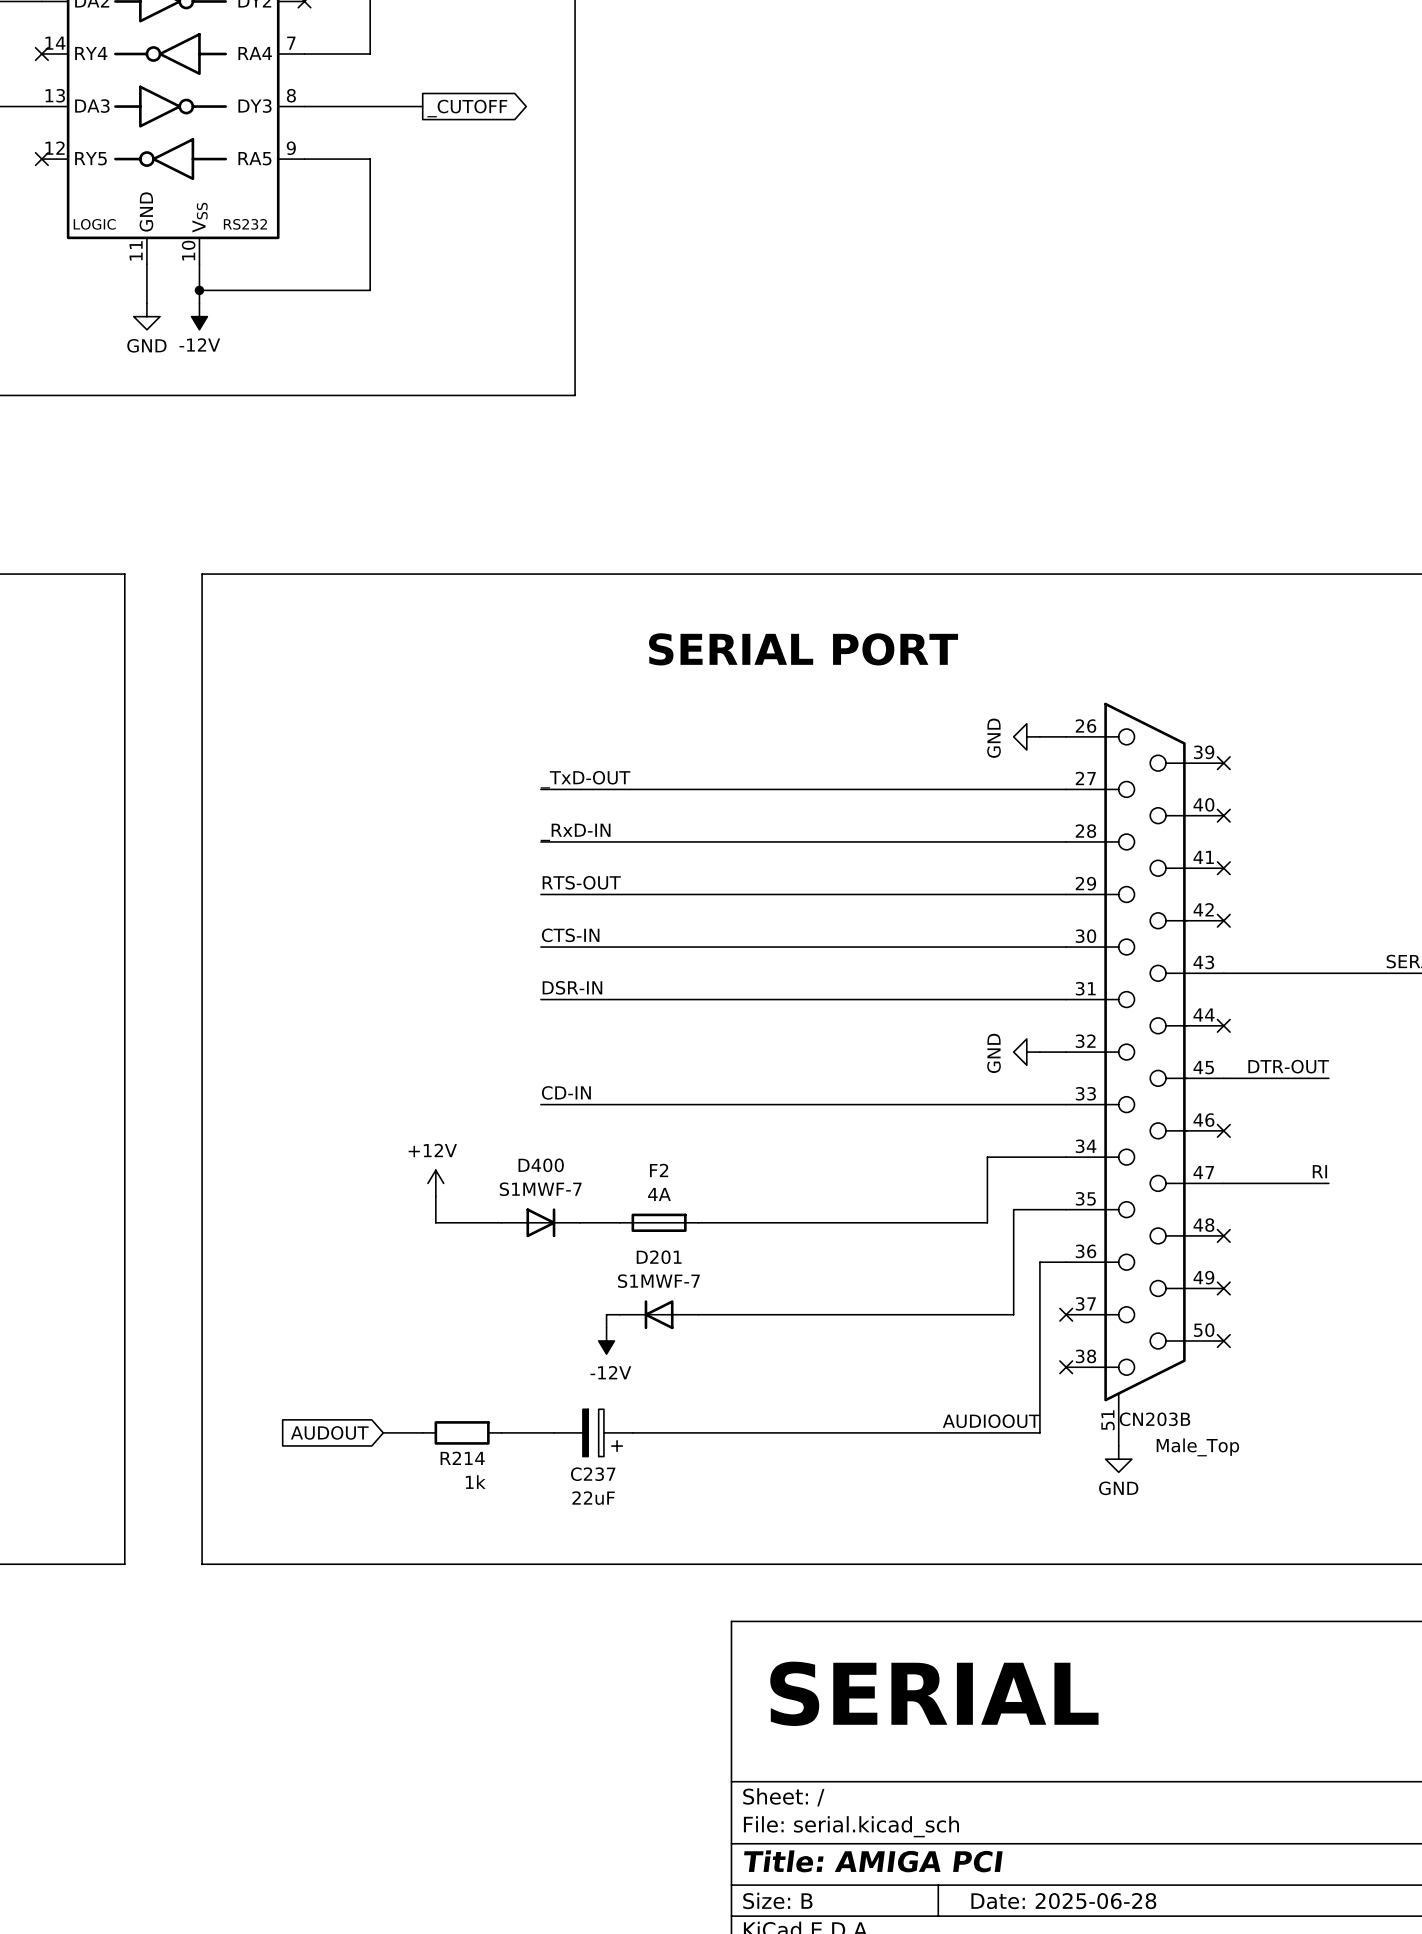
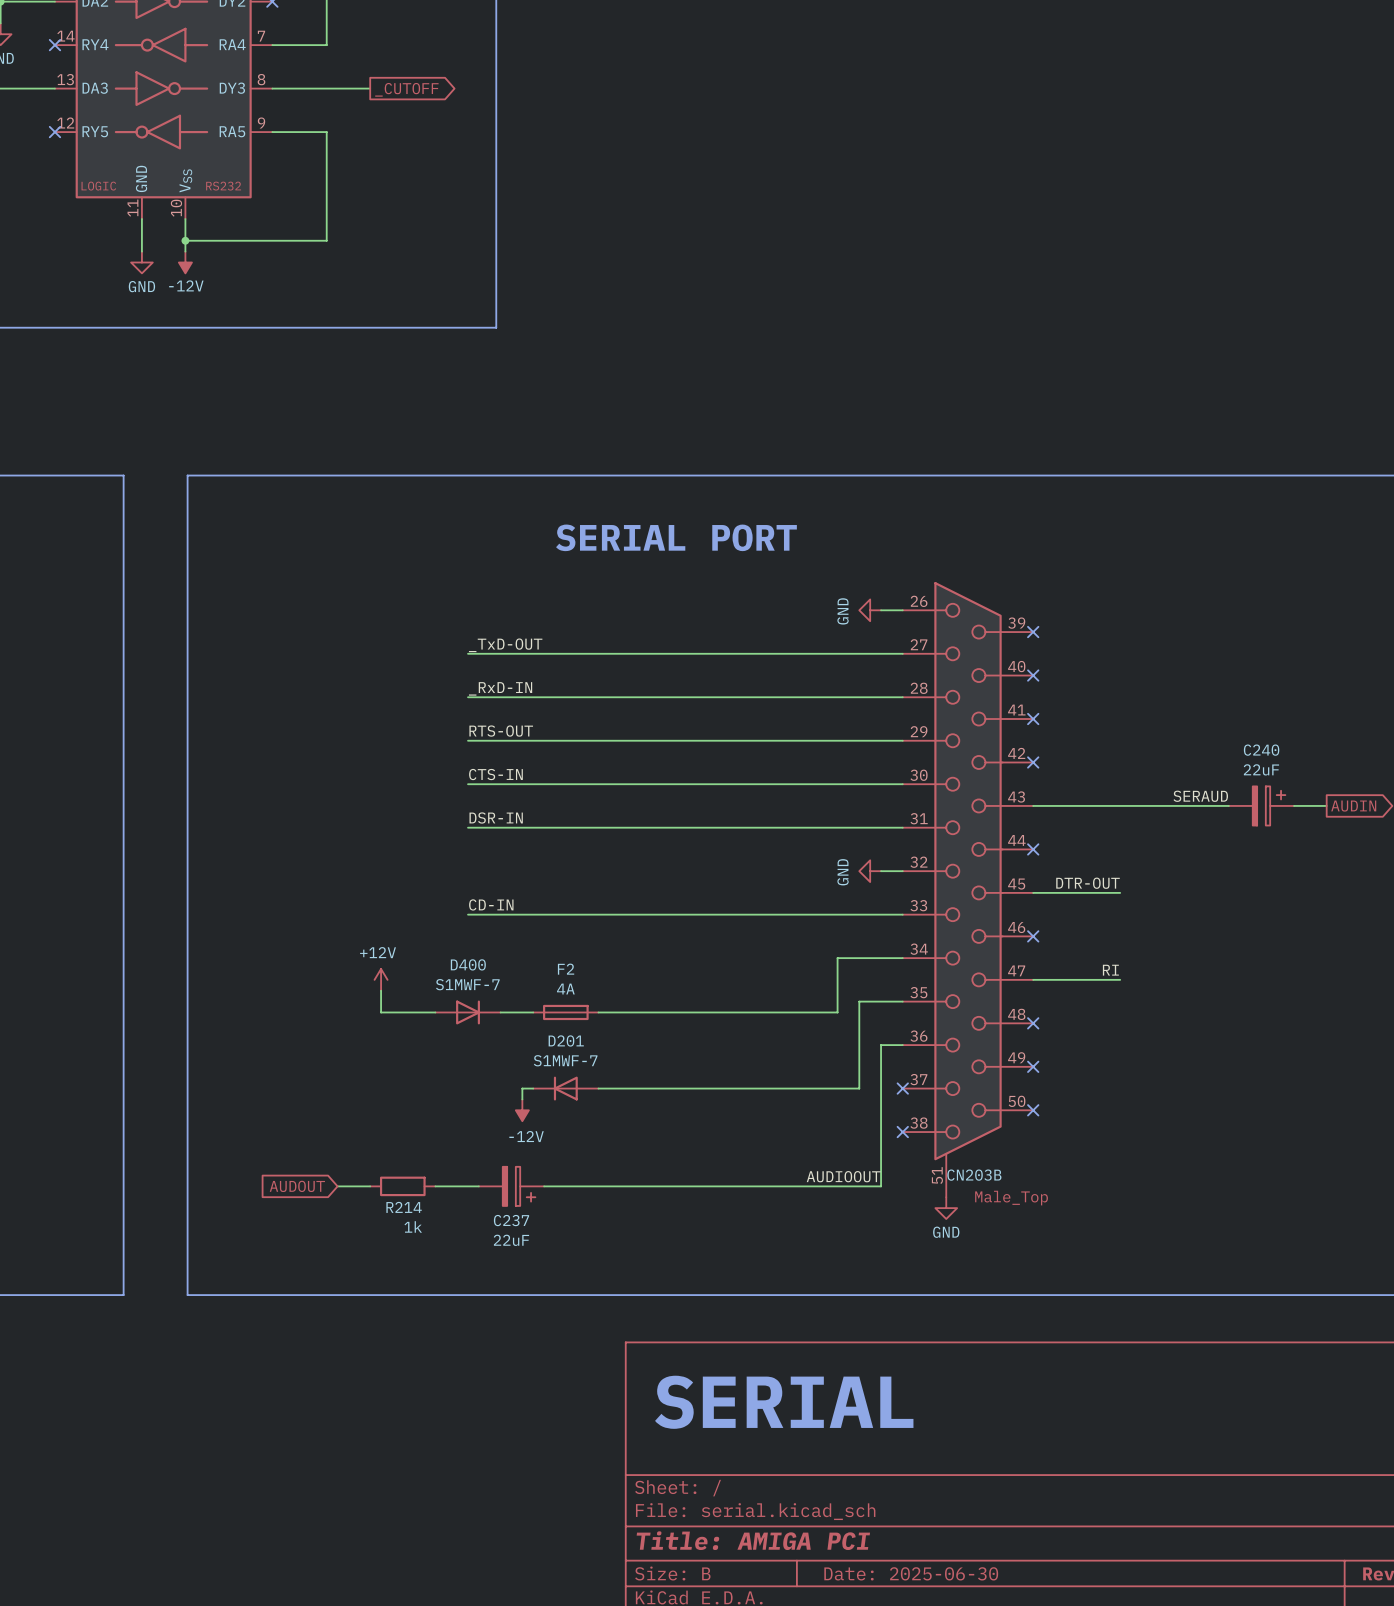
title block: Date: 2025-06-28 (1063, 1901) -> Date: 2025-06-30 (911, 1573)

